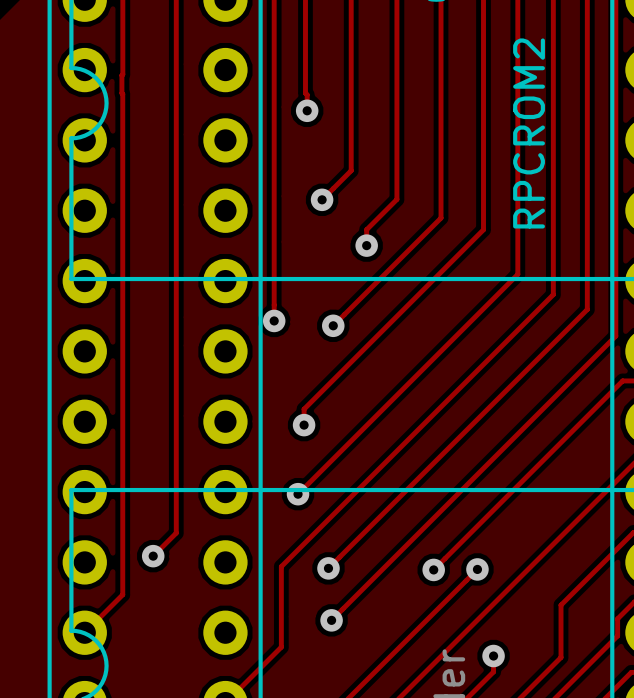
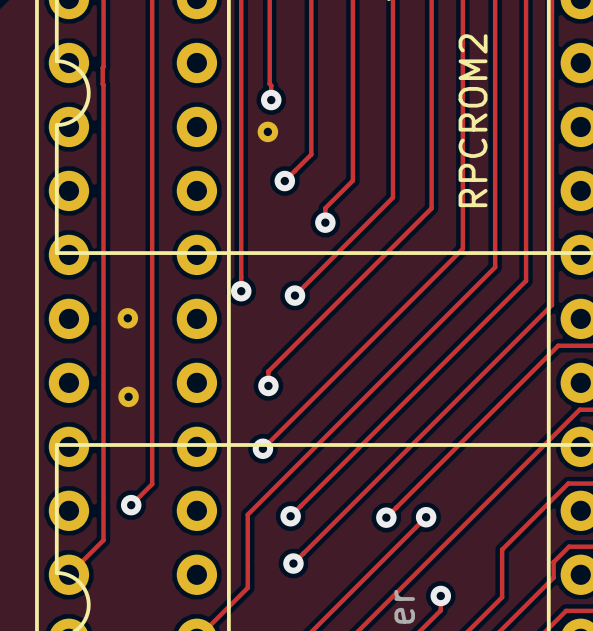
part: none -> (267, 131)
part: none -> (127, 318)
part: none -> (128, 396)

